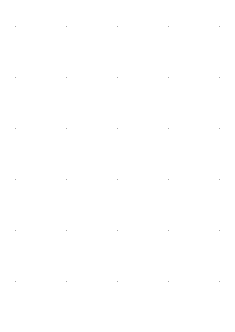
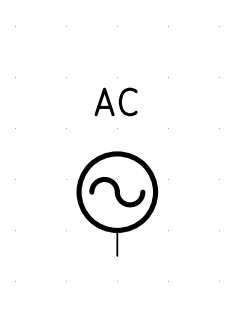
power symbol: none -> AC (117, 203)

